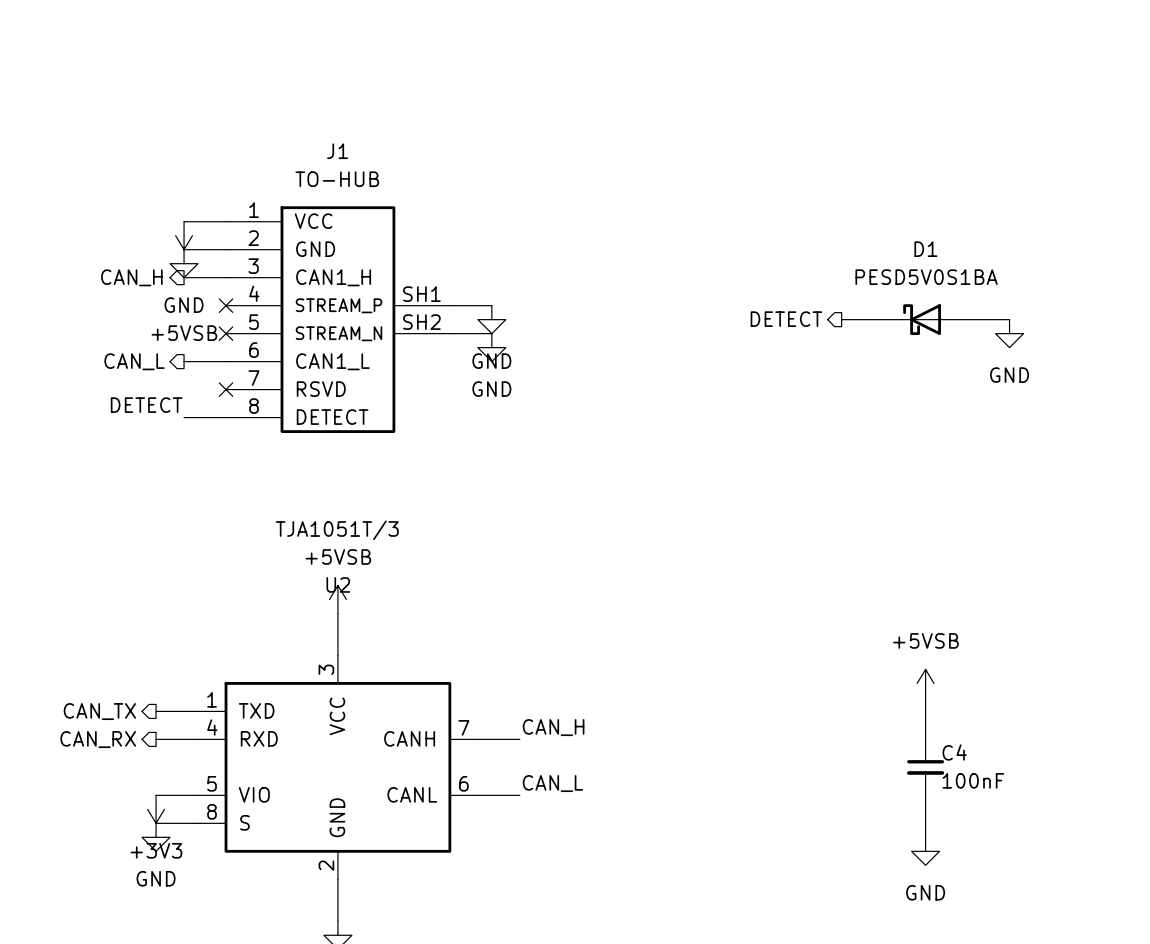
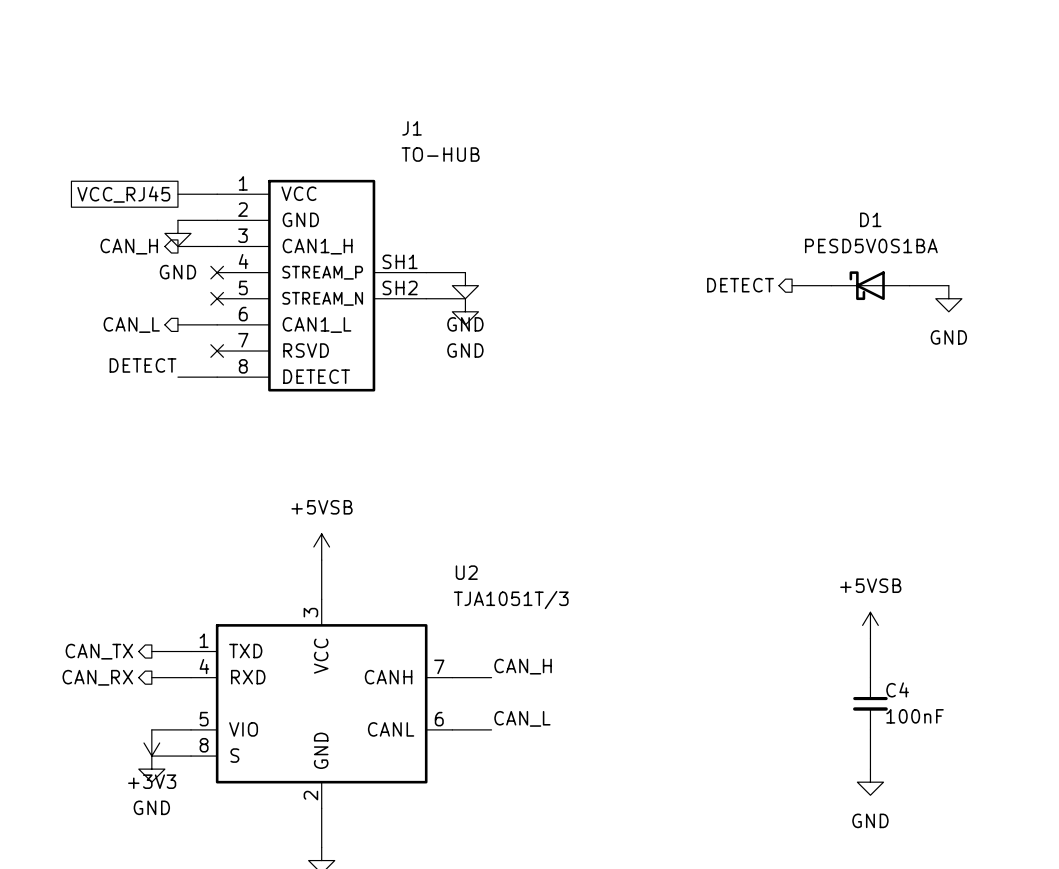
J1 name position: J1 (337, 151) -> J1 (412, 128)
J1 value position: TO-HUB (337, 179) -> TO-HUB (440, 154)
global label: none -> VCC_RJ45 (123, 194)
power symbol: +5VSB (184, 235) -> none
U2 value position: TJA1051T/3 (337, 530) -> TJA1051T/3 (511, 600)
U2 name position: U2 (338, 584) -> U2 (466, 572)

